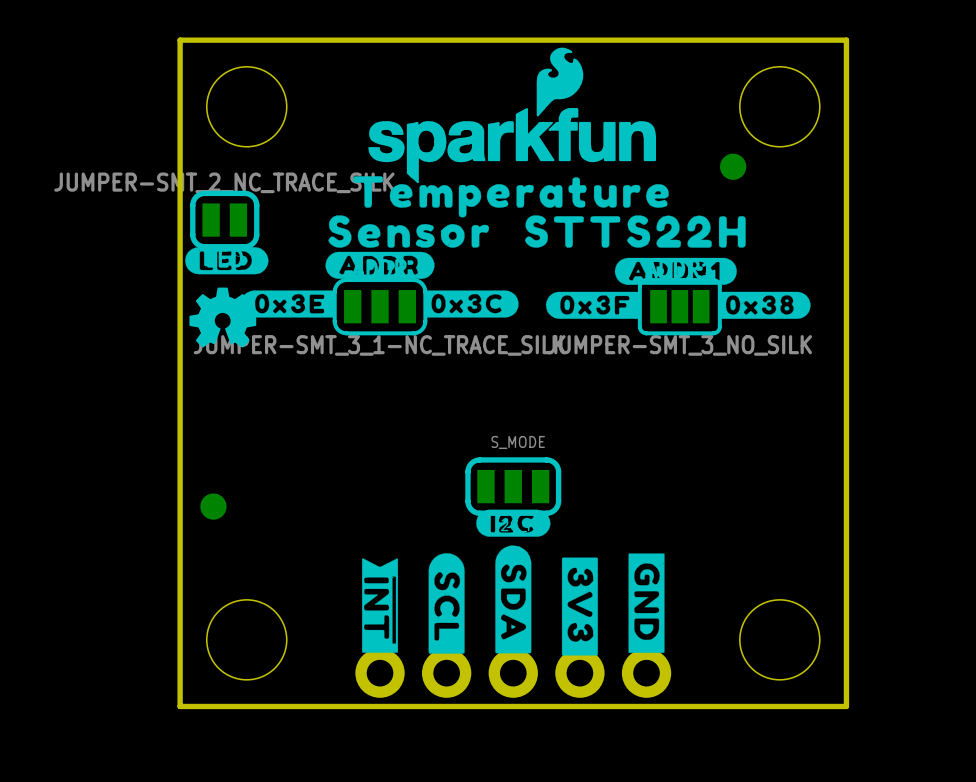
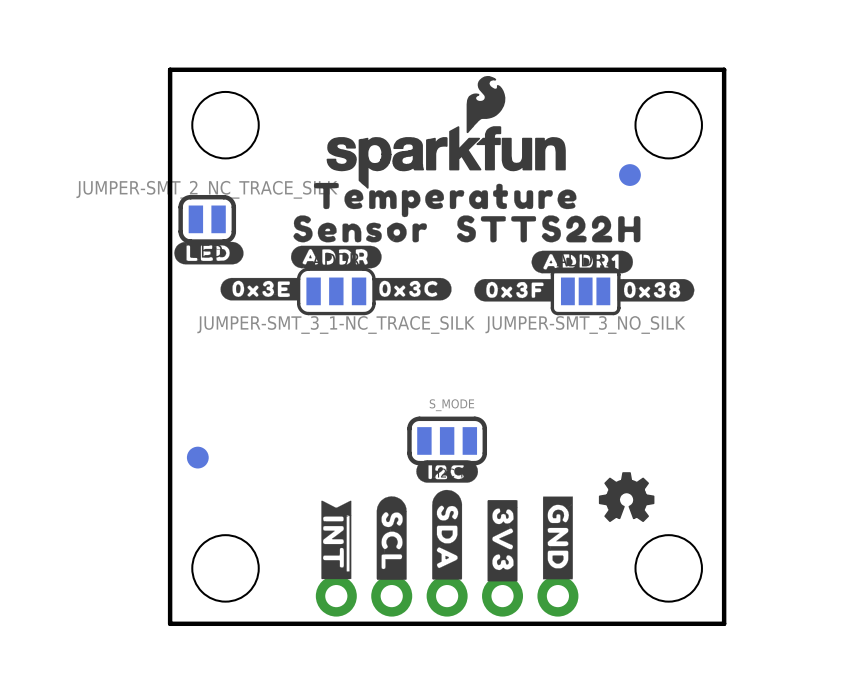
drawing position: (222, 317) -> (626, 497)

